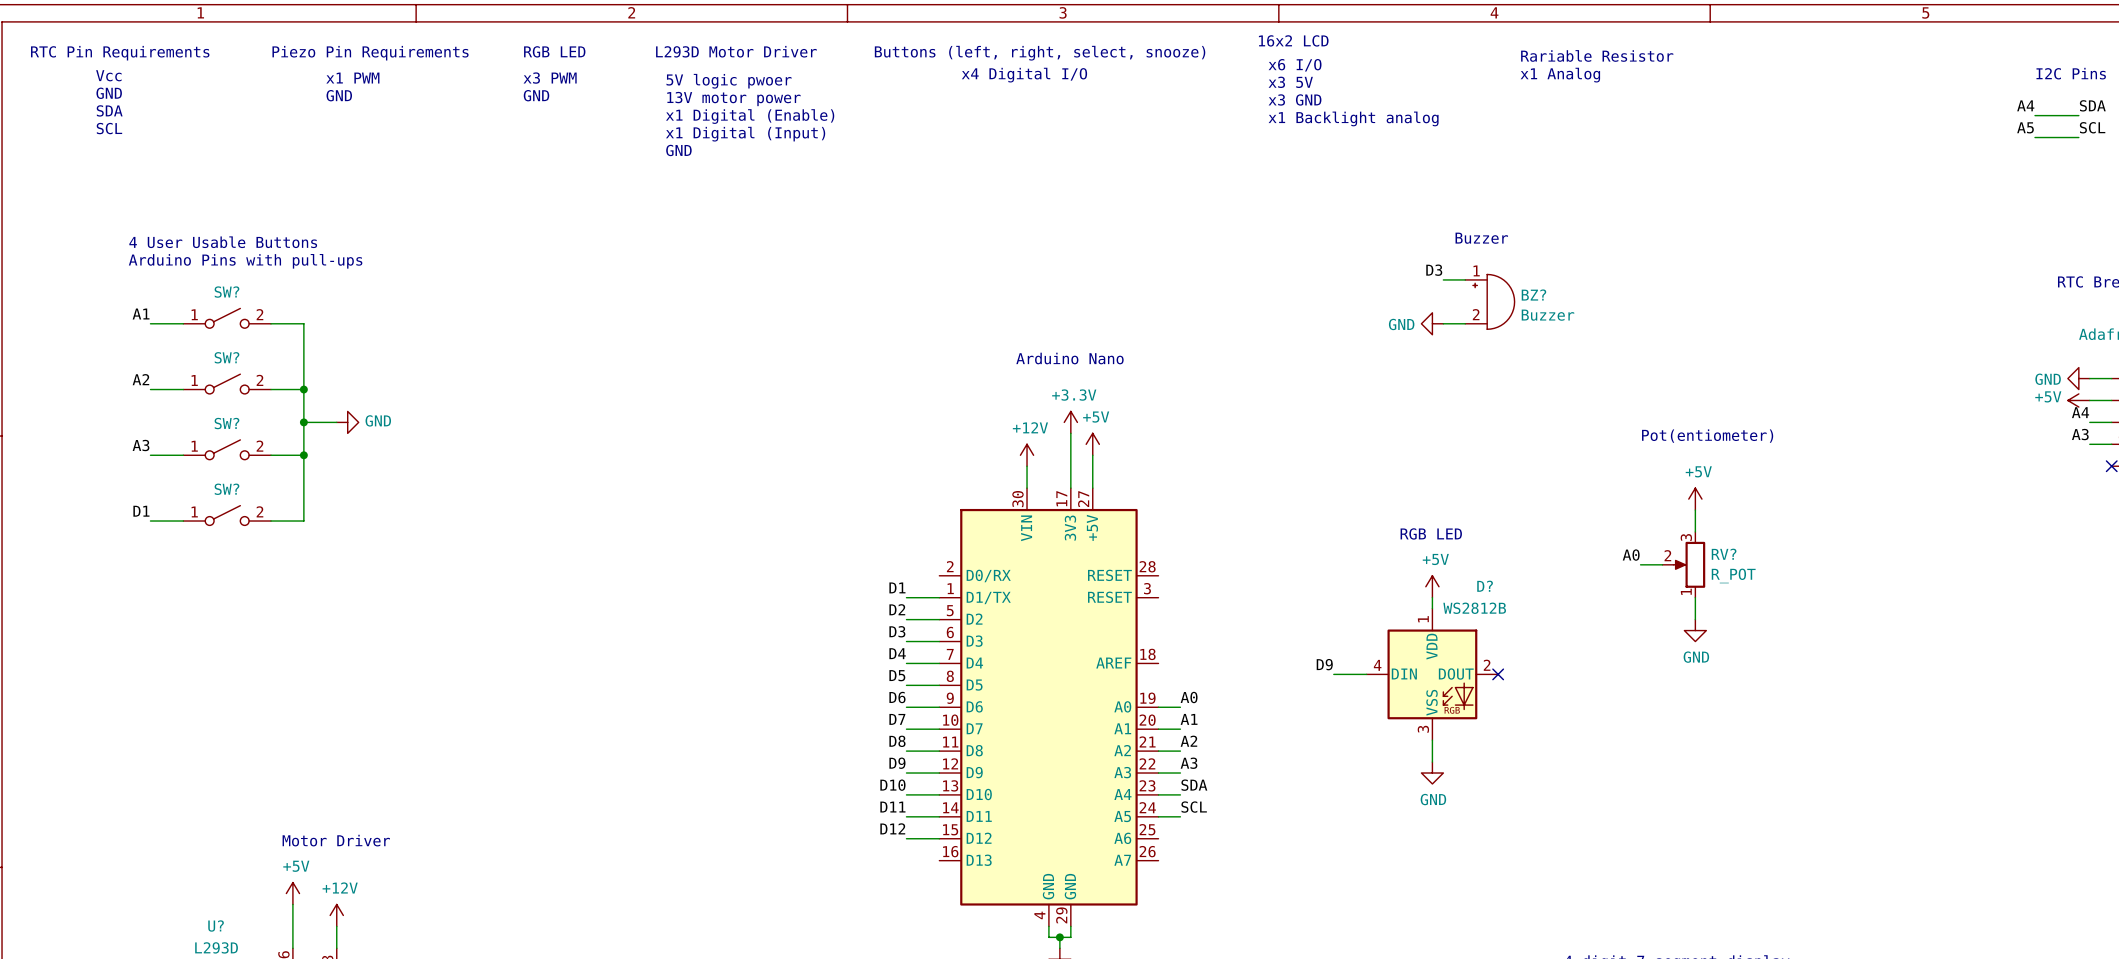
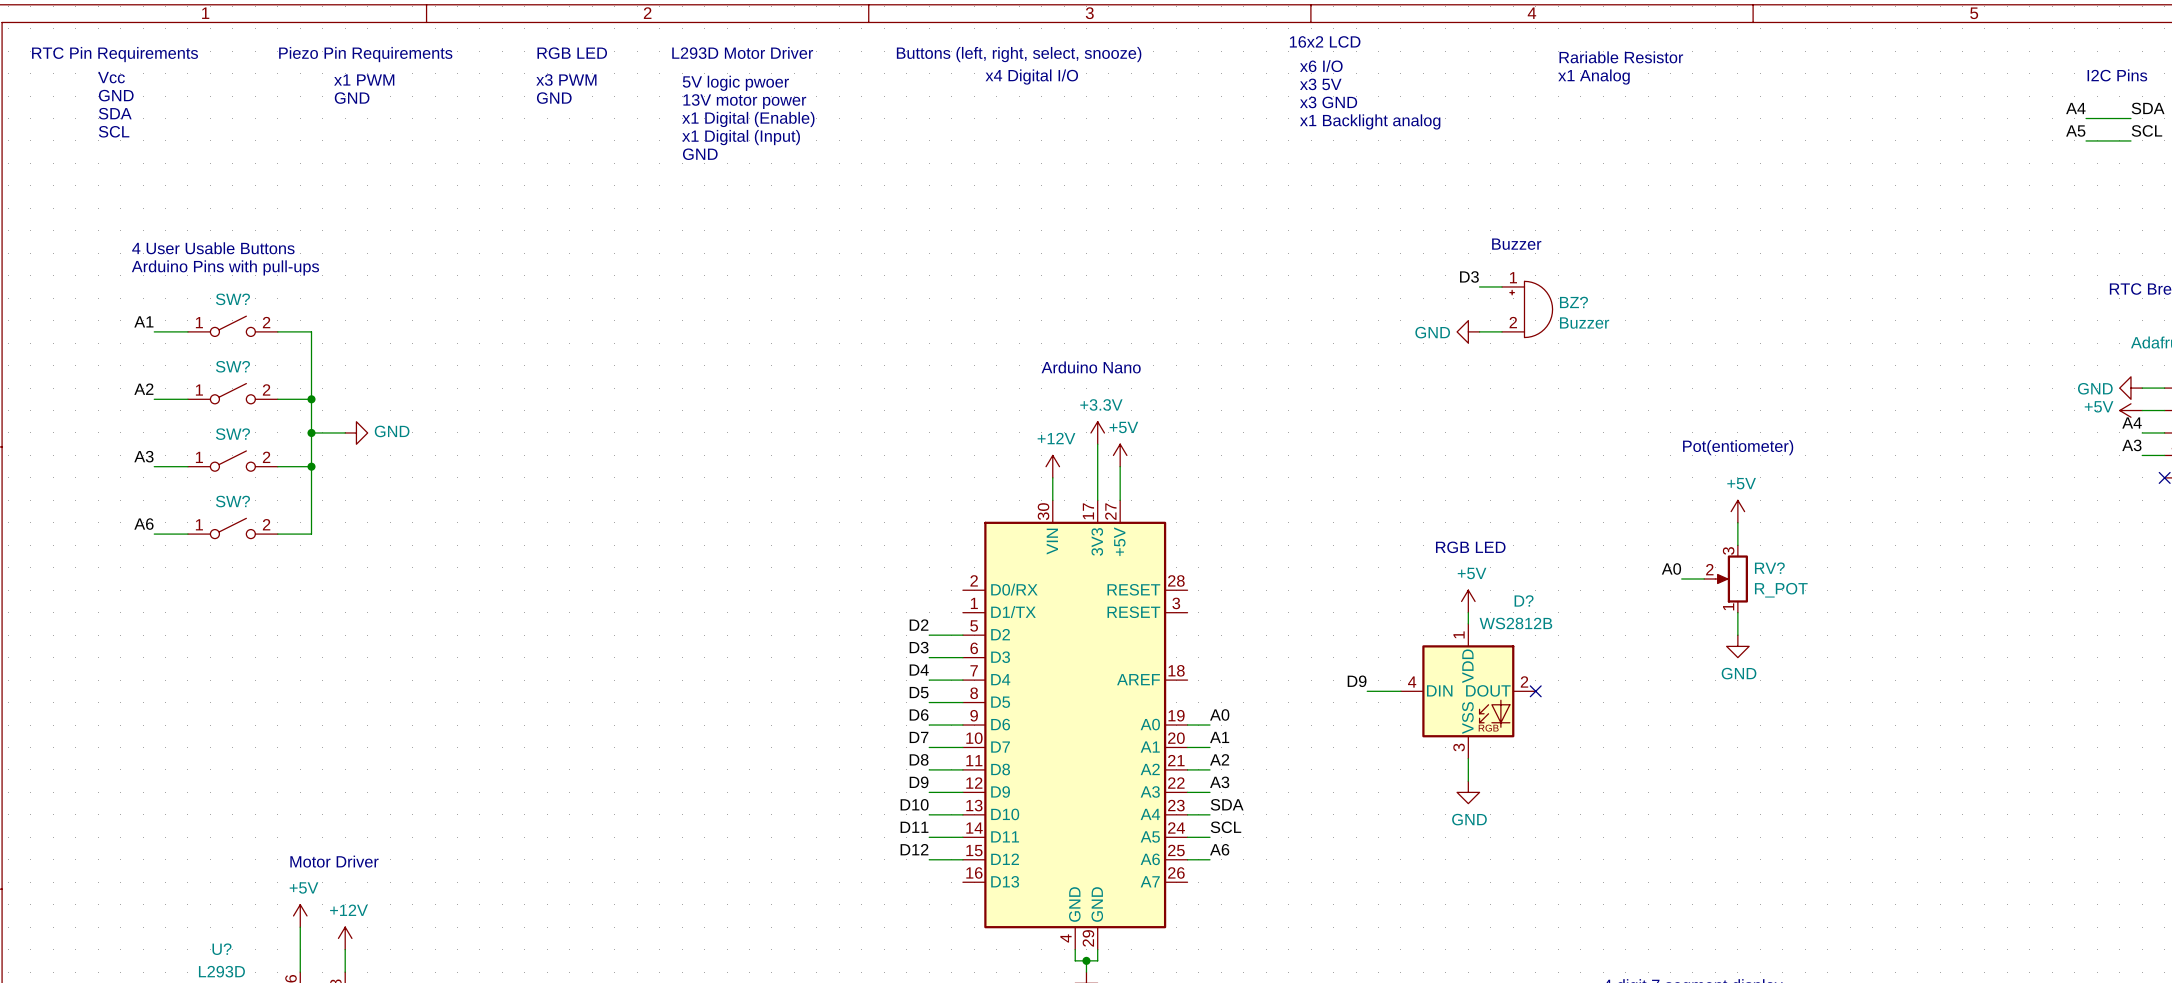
label: D1 (141, 511) -> A6 (143, 524)
label: D1 (897, 587) -> none
wire: (906, 597) (939, 597) -> none
label: none -> A6 (1219, 849)
wire: none -> (1187, 859) (1210, 859)

